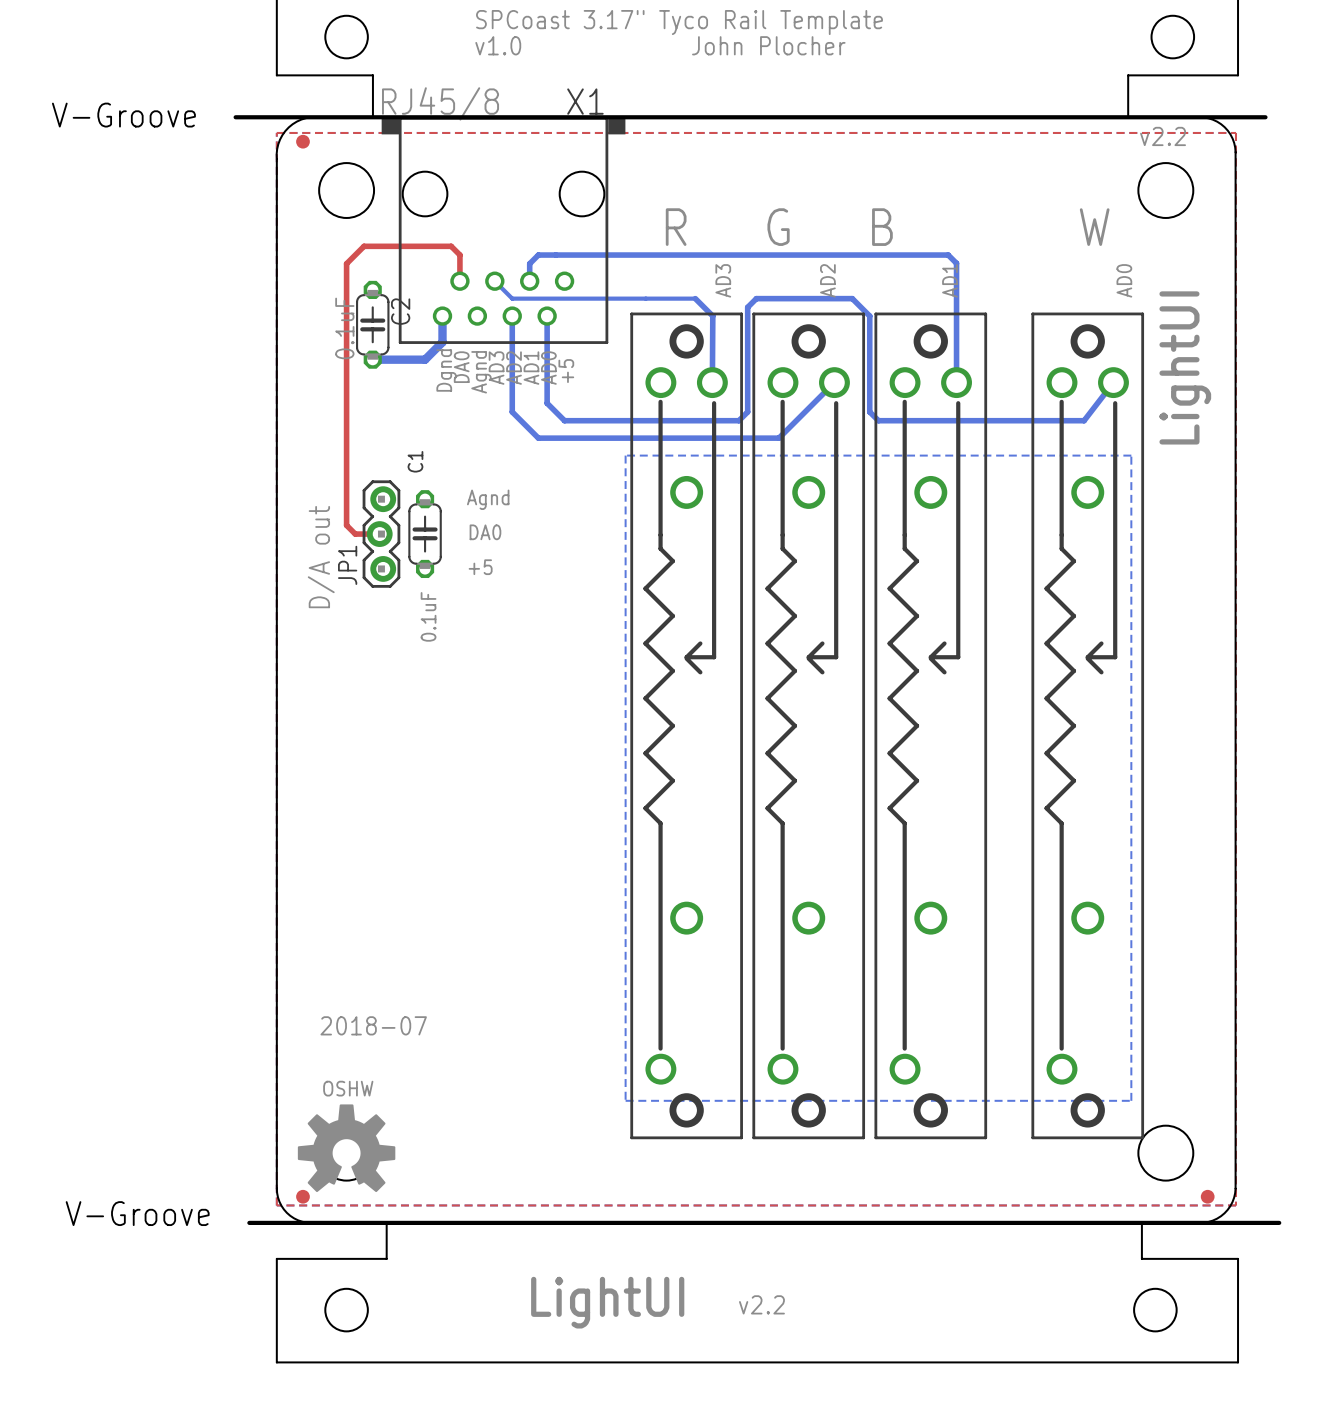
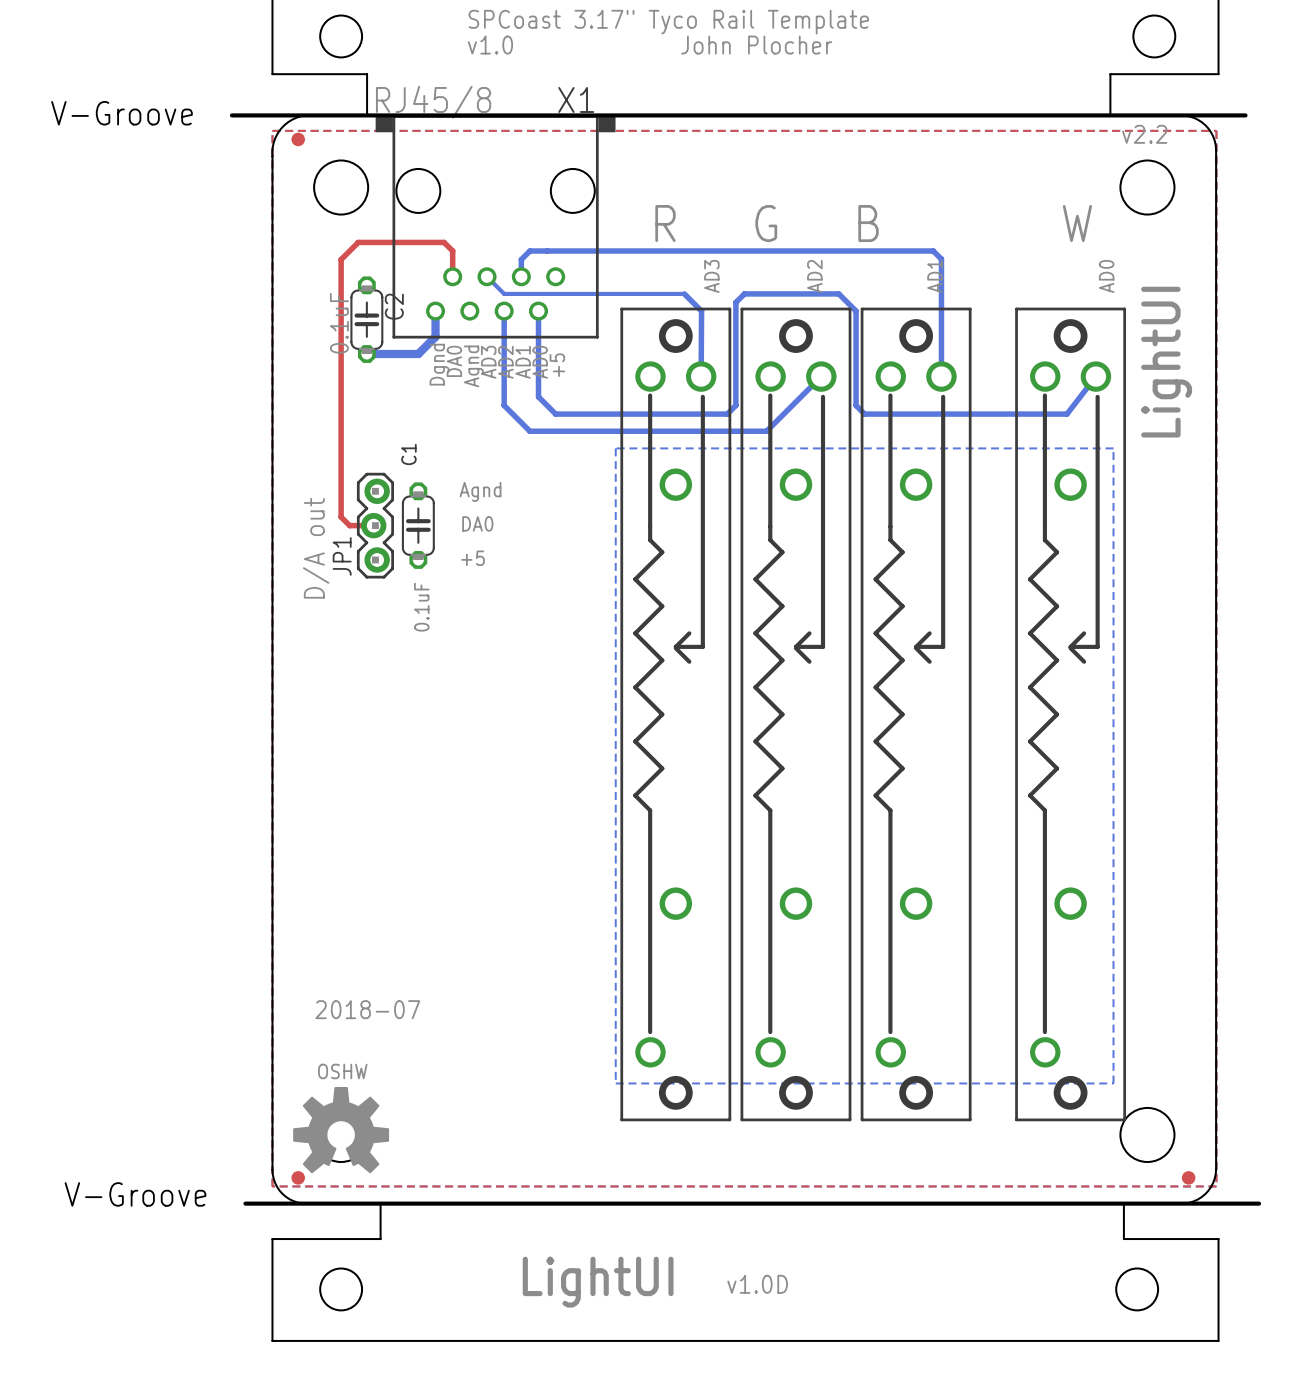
text: v2.2 (761, 1304) -> v1.0D (757, 1284)

